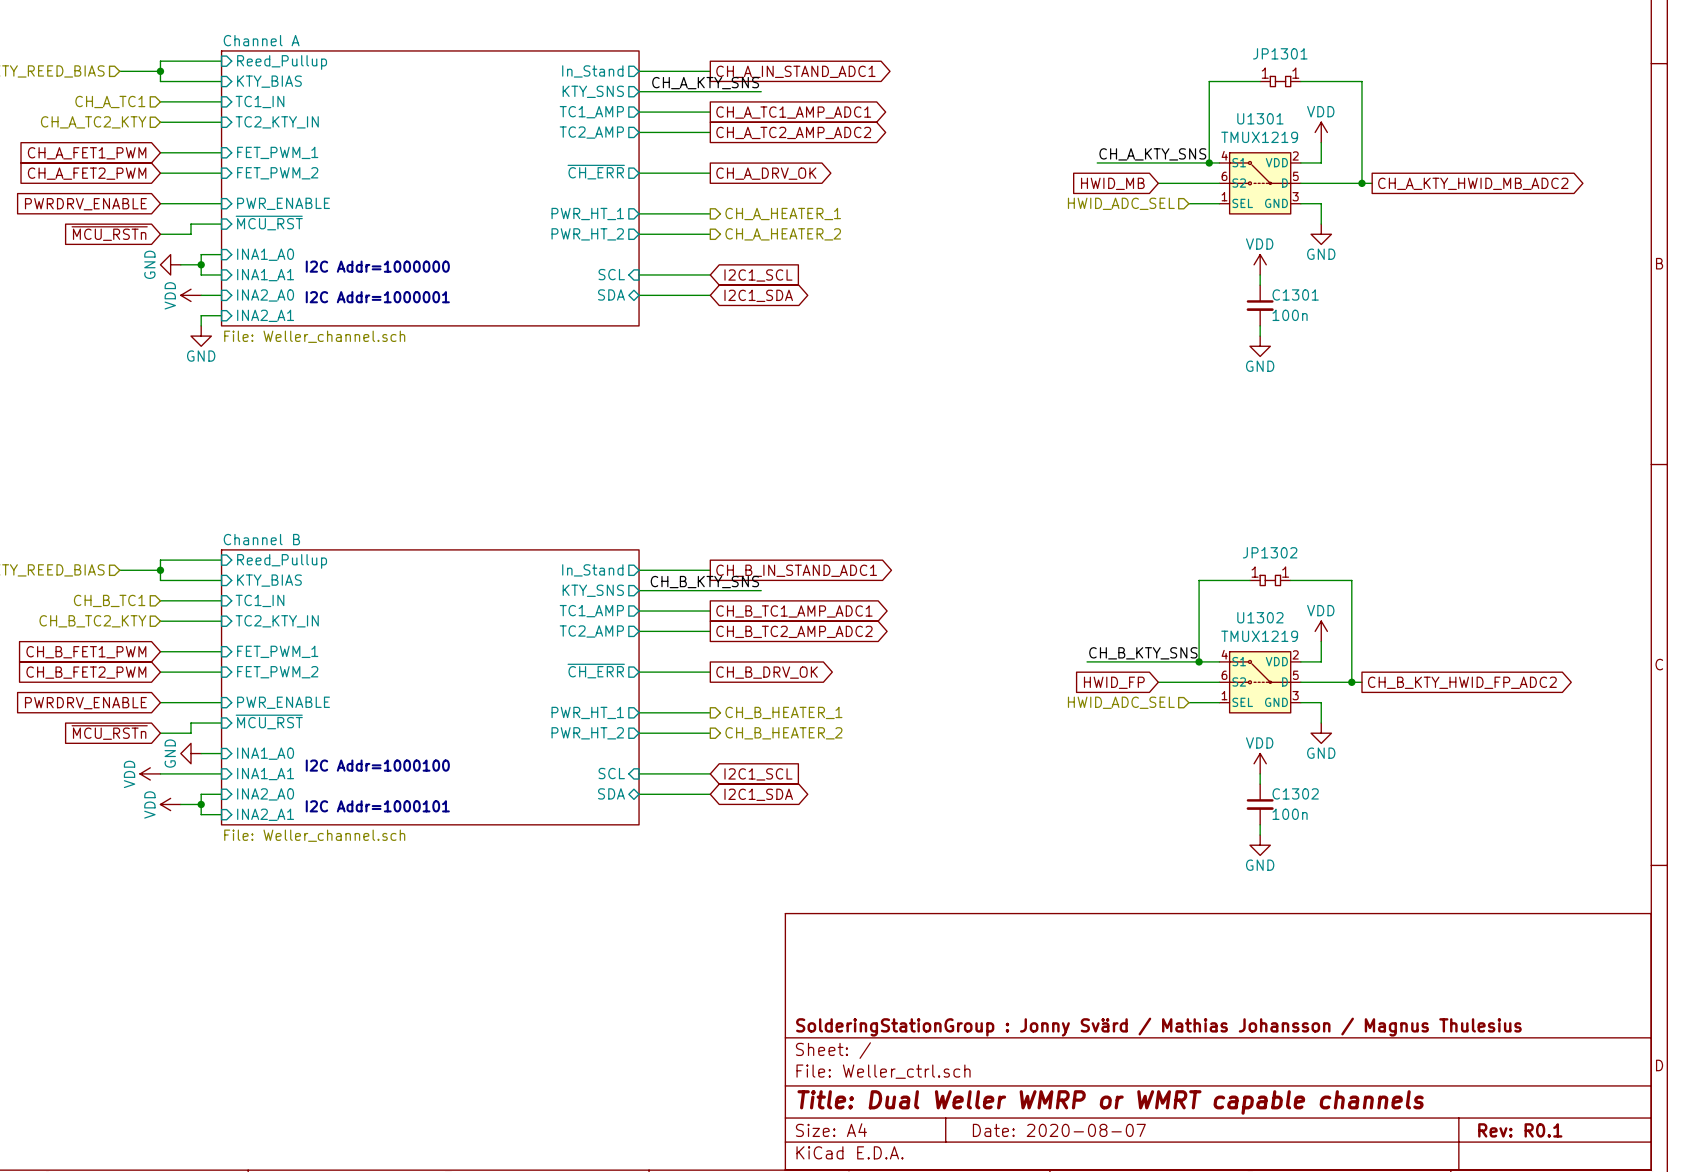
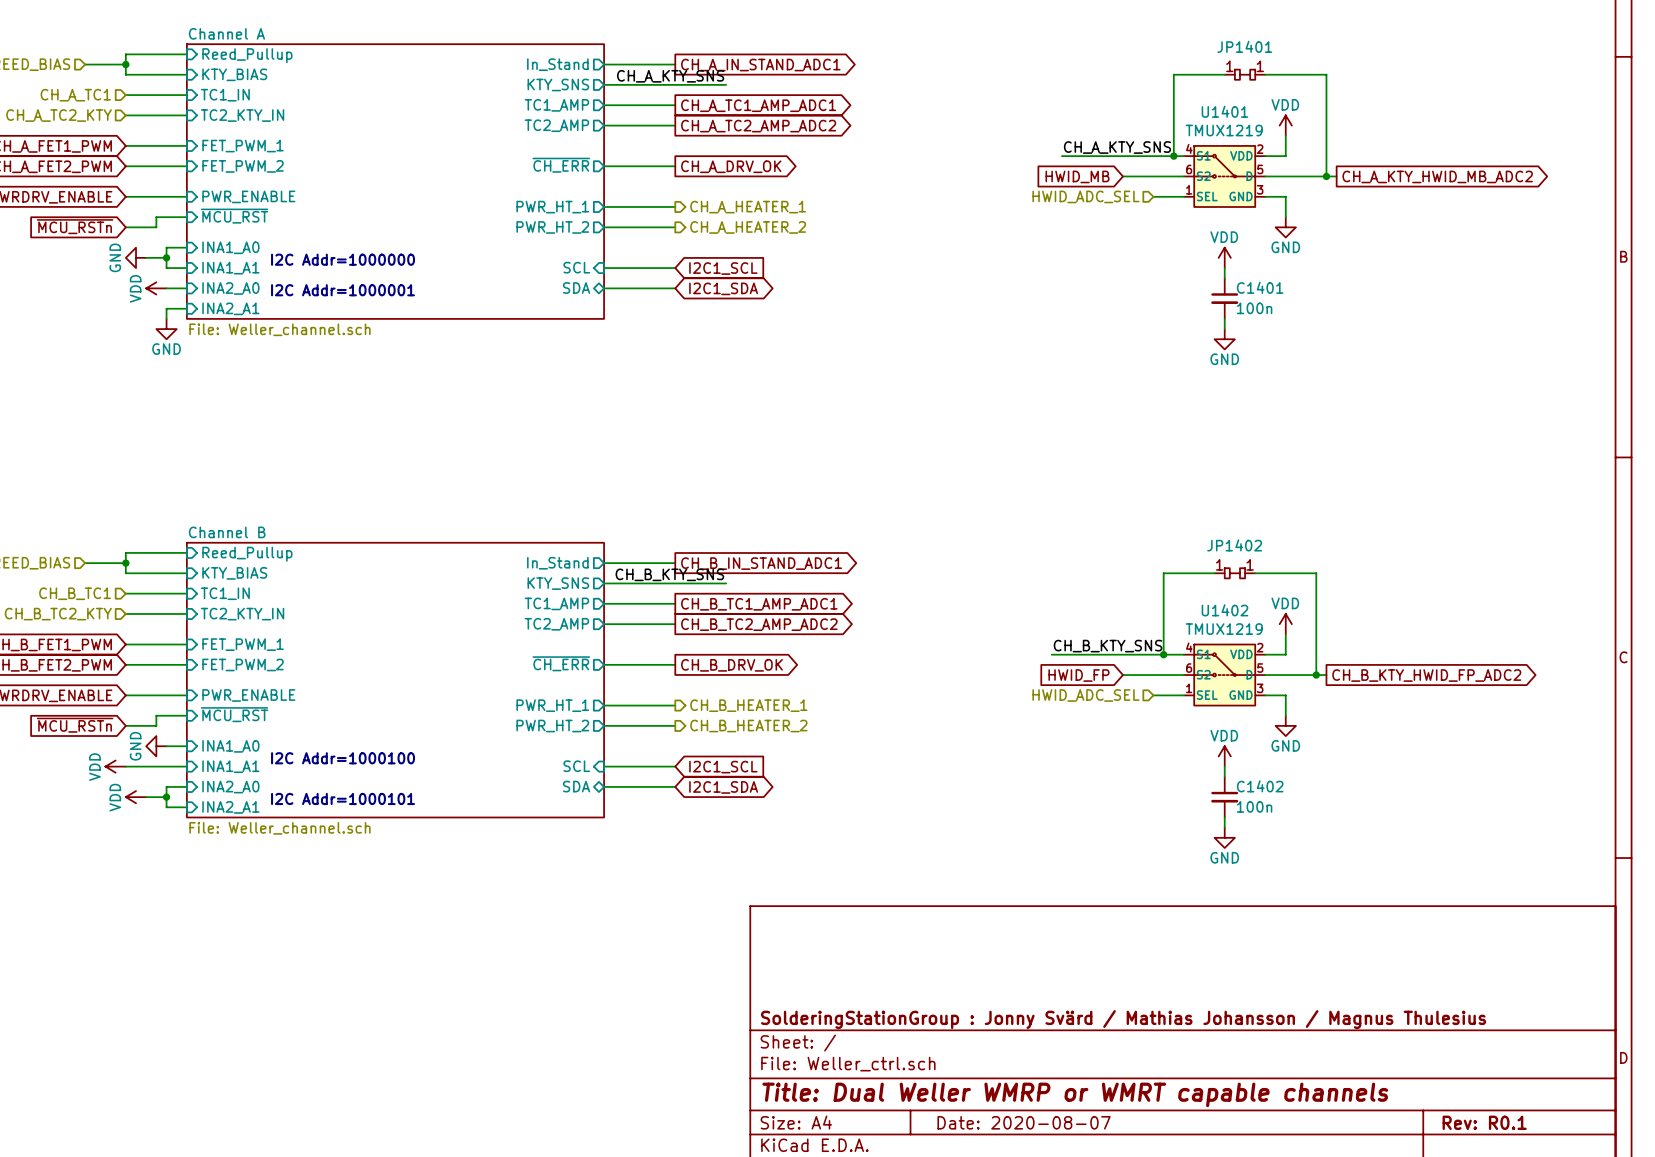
JP1301 name: JP1301 (1280, 53) -> JP1401 (1244, 46)
U1301 name: U1301 (1260, 118) -> U1401 (1224, 111)
C1301 name: C1301 (1295, 294) -> C1401 (1260, 287)
JP1302 name: JP1302 (1270, 552) -> JP1402 (1234, 545)
U1302 name: U1302 (1260, 617) -> U1402 (1224, 610)
C1302 name: C1302 (1295, 793) -> C1402 (1260, 786)

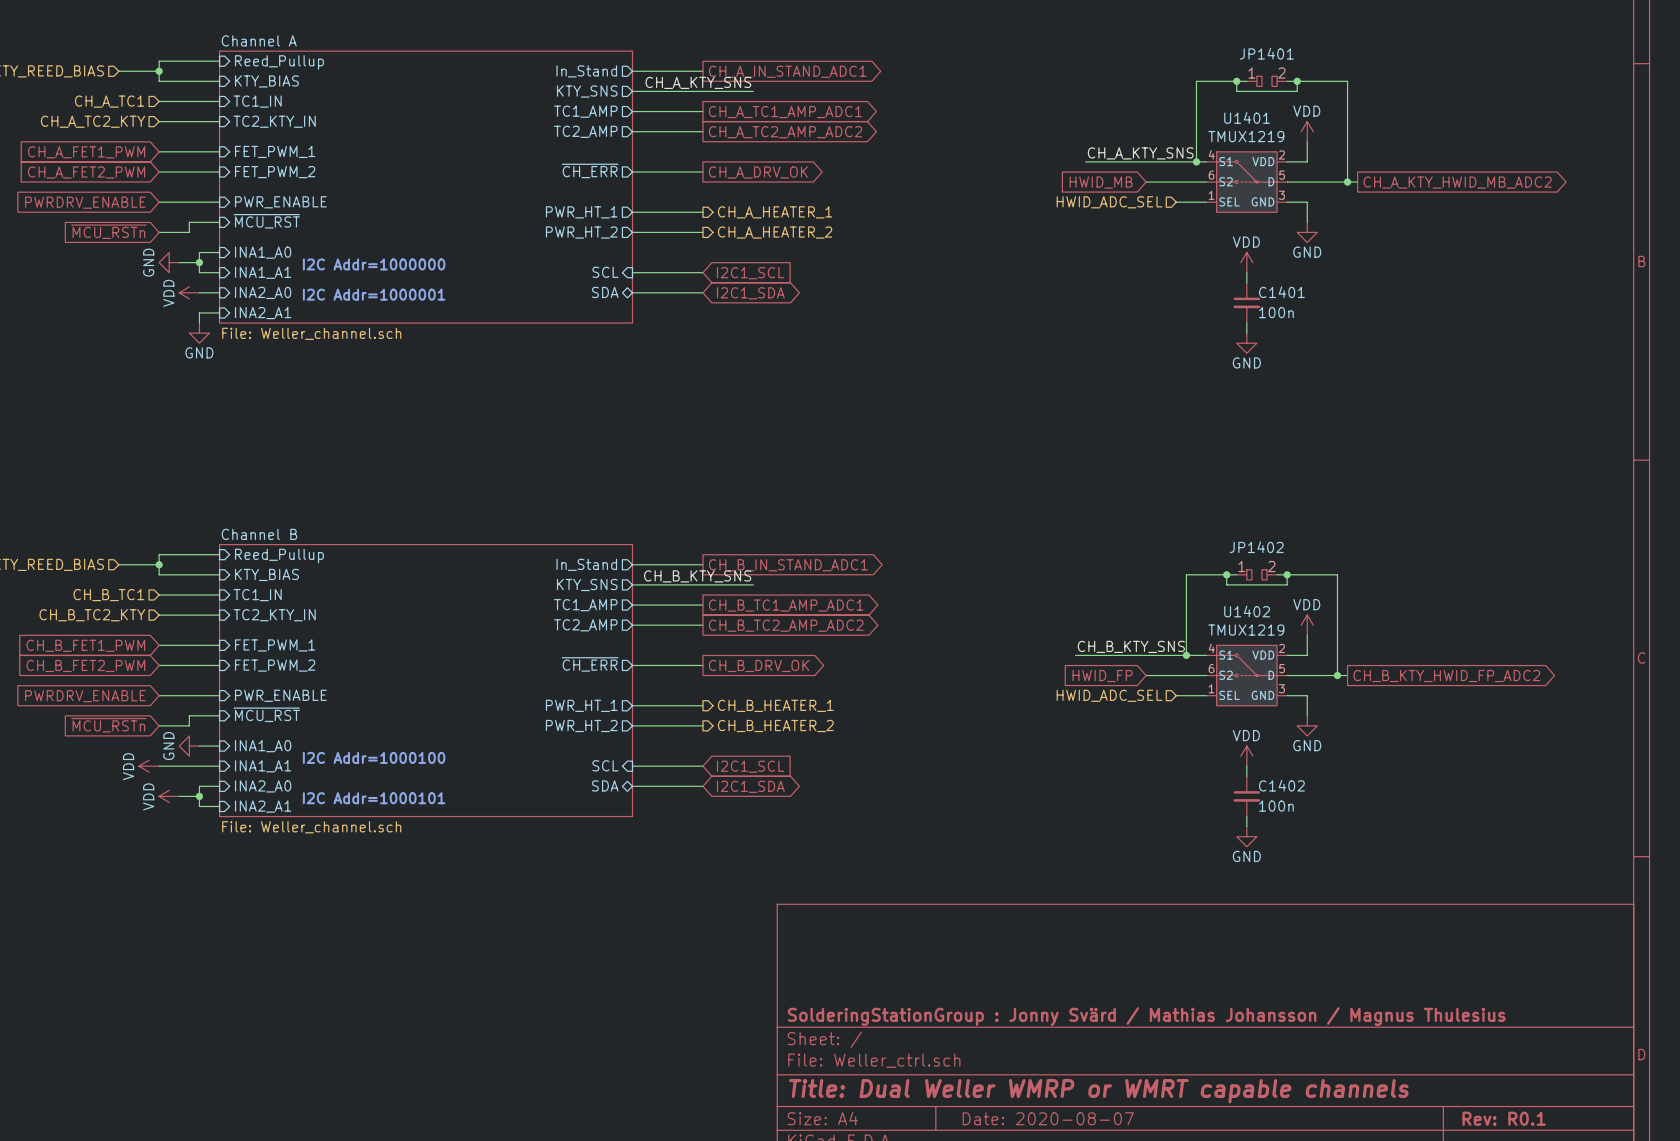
JP1401 symbol: [1224, 69, 1266, 80] -> [1246, 76, 1288, 87]
wire: none -> (1236, 81) (1236, 91) (1297, 91) (1297, 81)
junction: none -> (1236, 81)
junction: none -> (1297, 81)
JP1402 symbol: [1214, 568, 1256, 579] -> [1236, 569, 1278, 580]
wire: none -> (1226, 574) (1226, 584) (1287, 584) (1287, 574)
junction: none -> (1226, 574)
junction: none -> (1287, 574)

